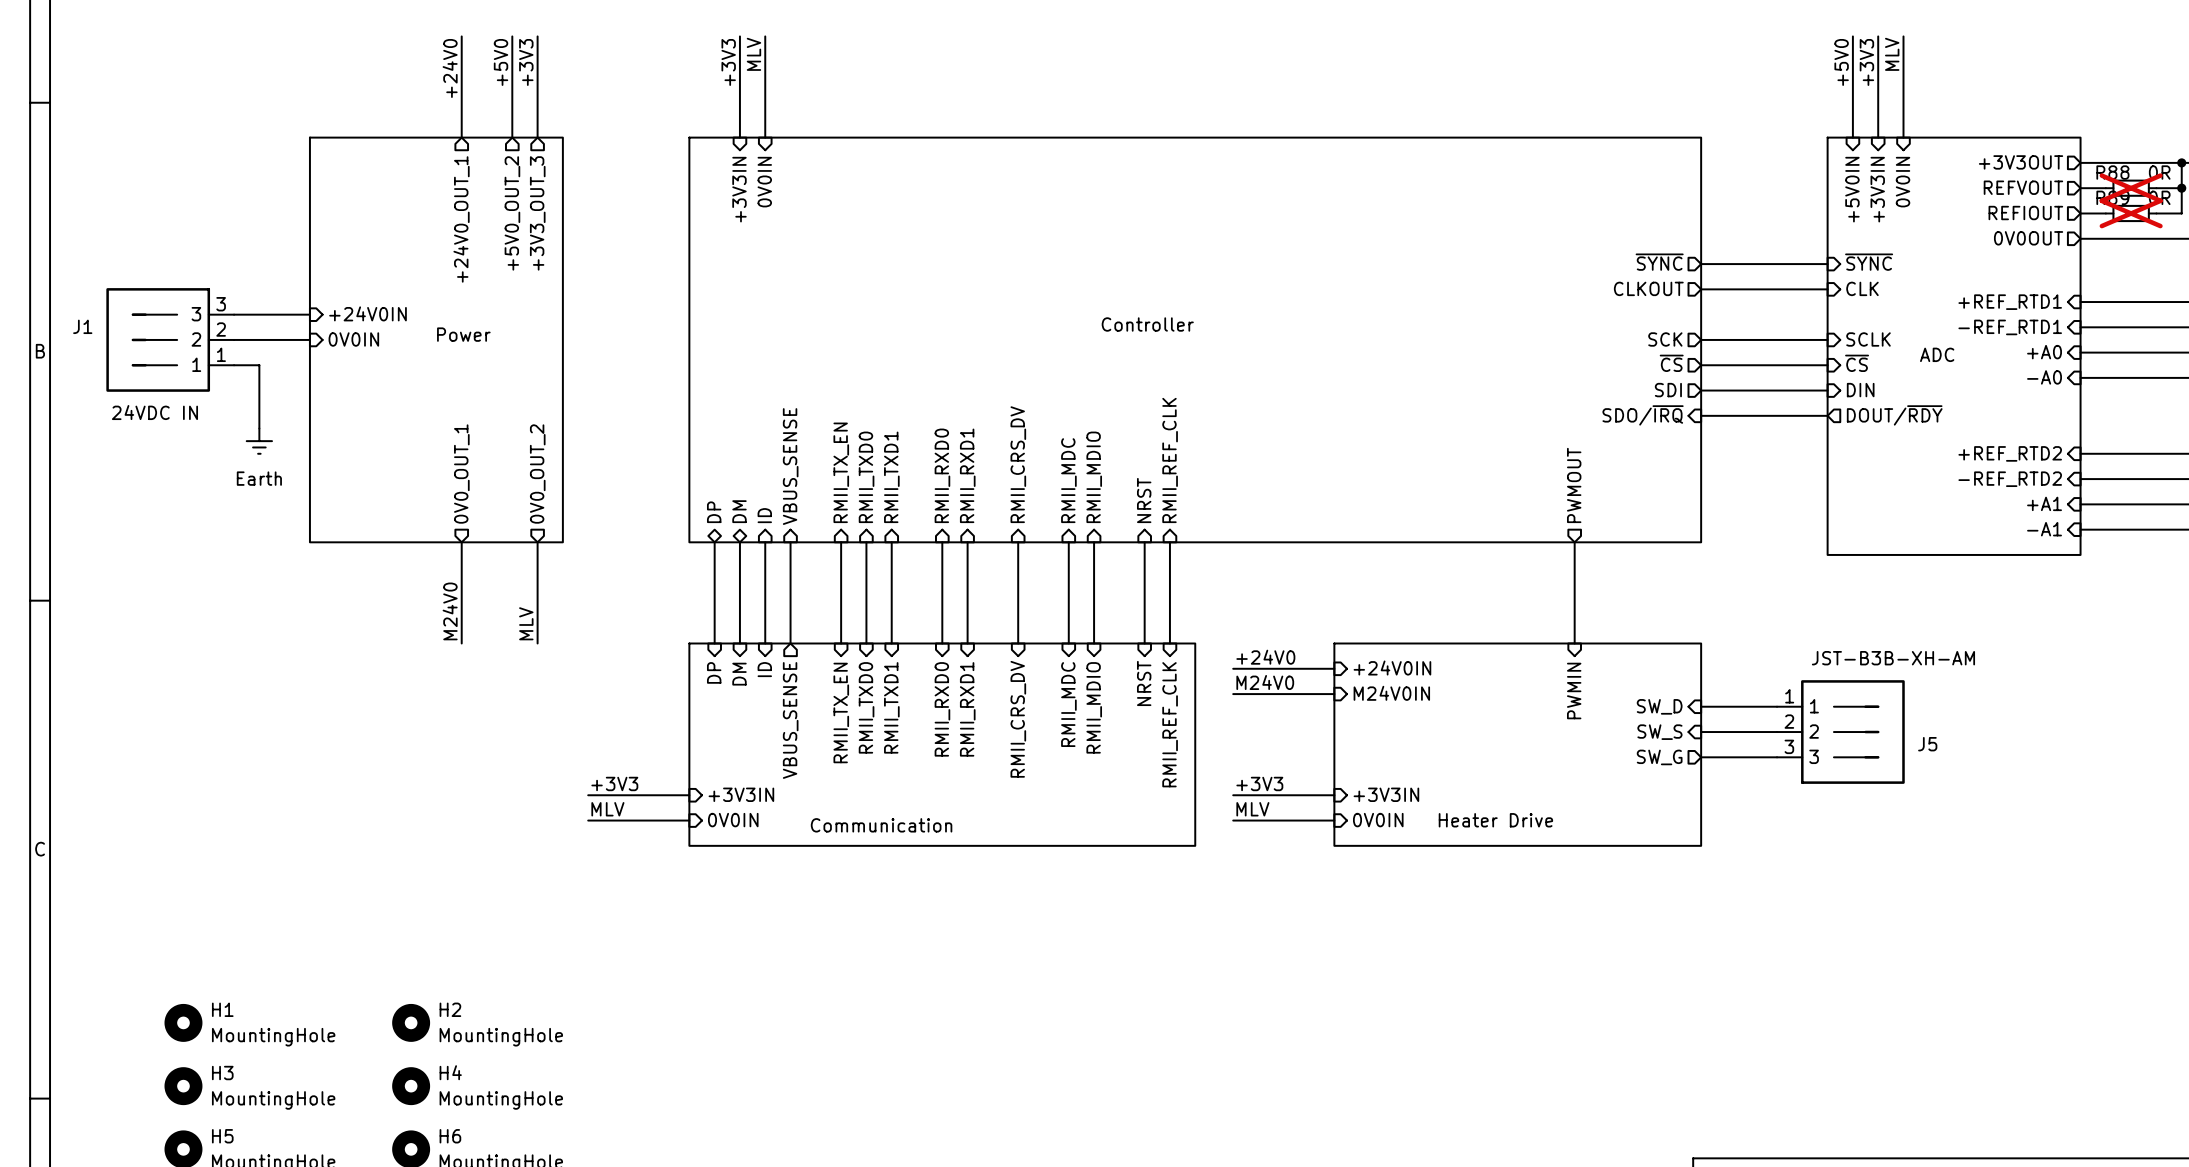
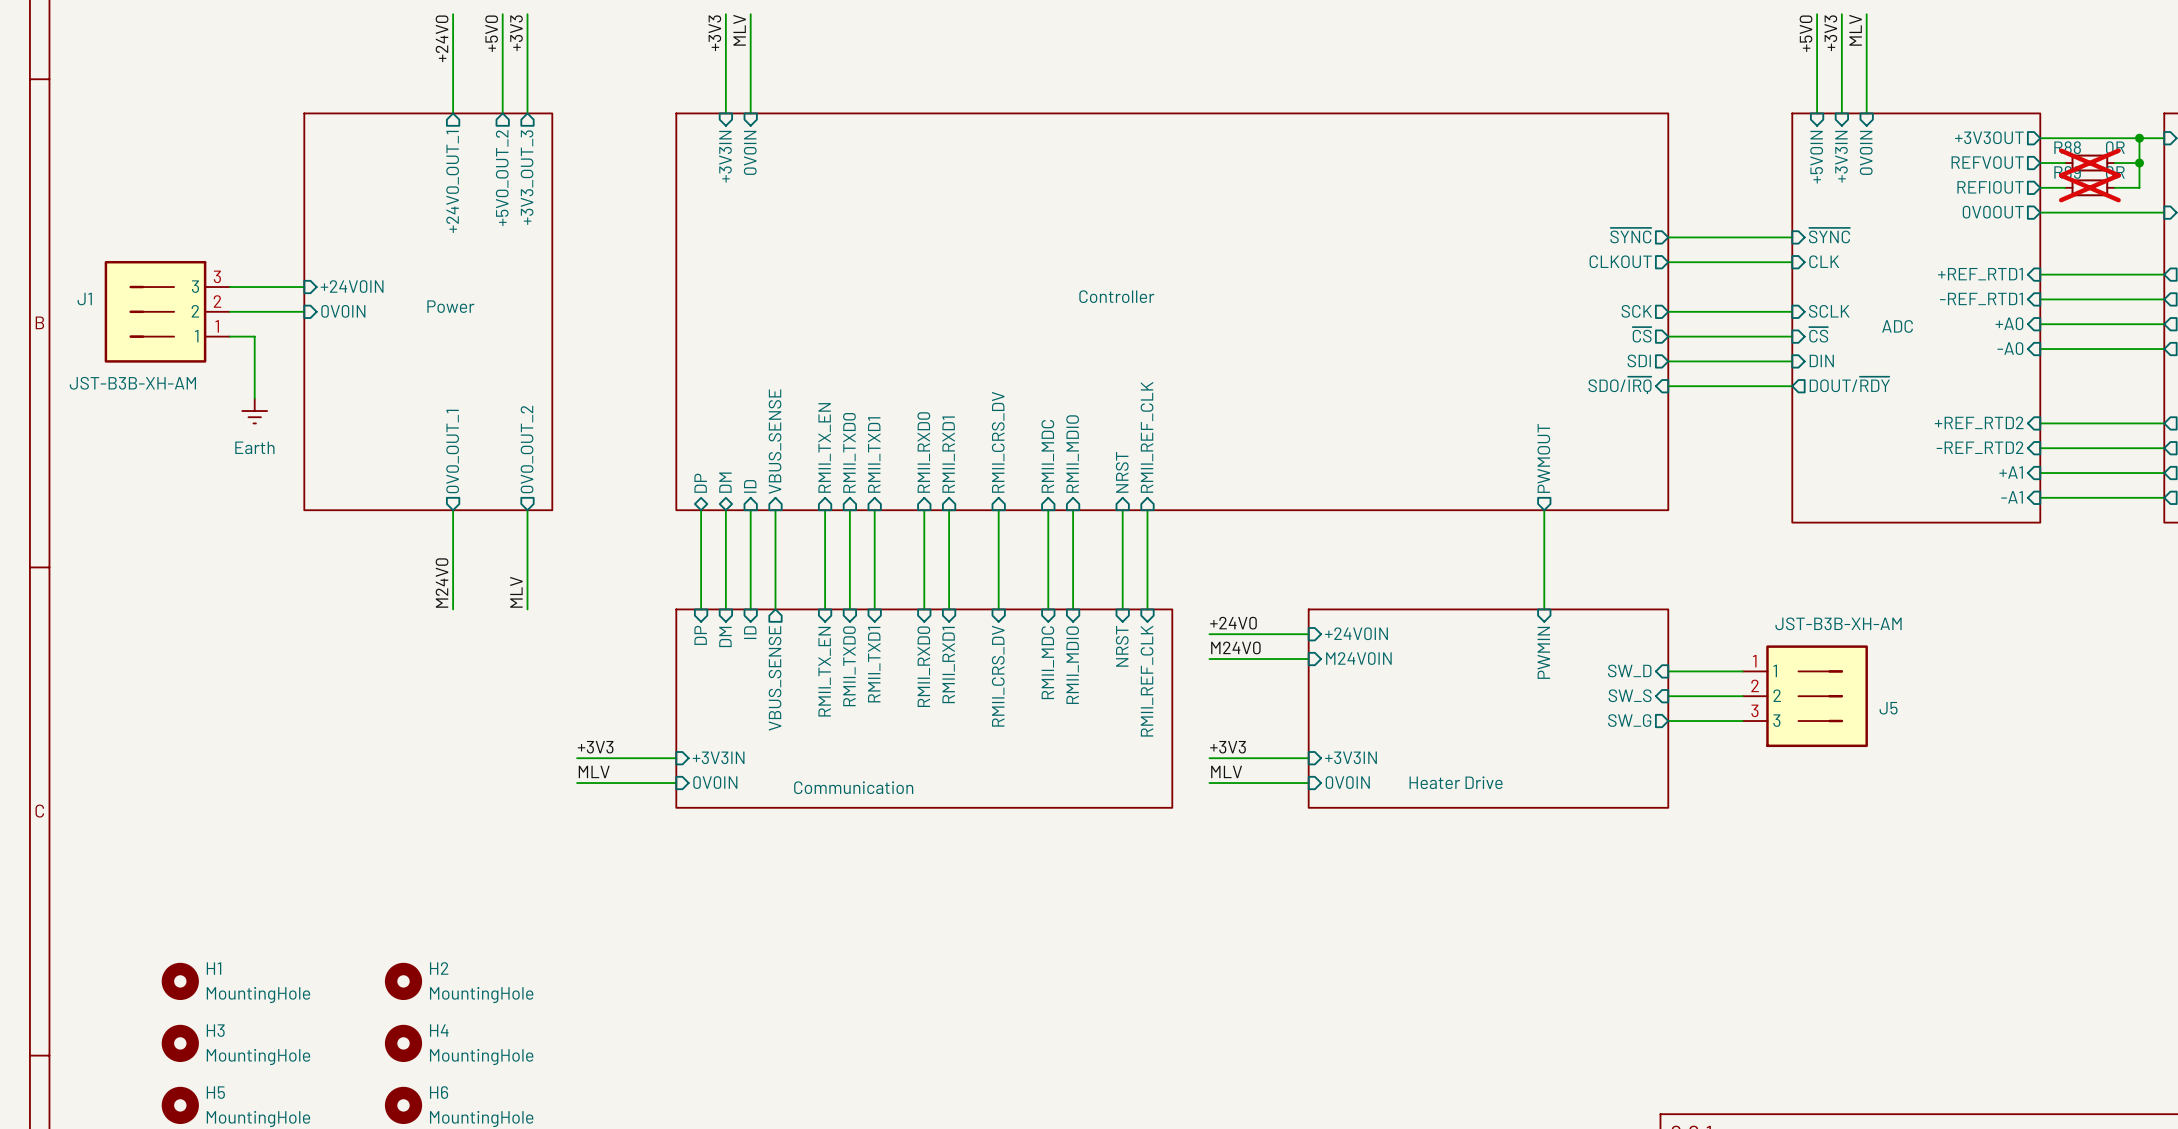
J1 value: 24VDC IN (154, 412) -> JST-B3B-XH-AM (132, 383)

